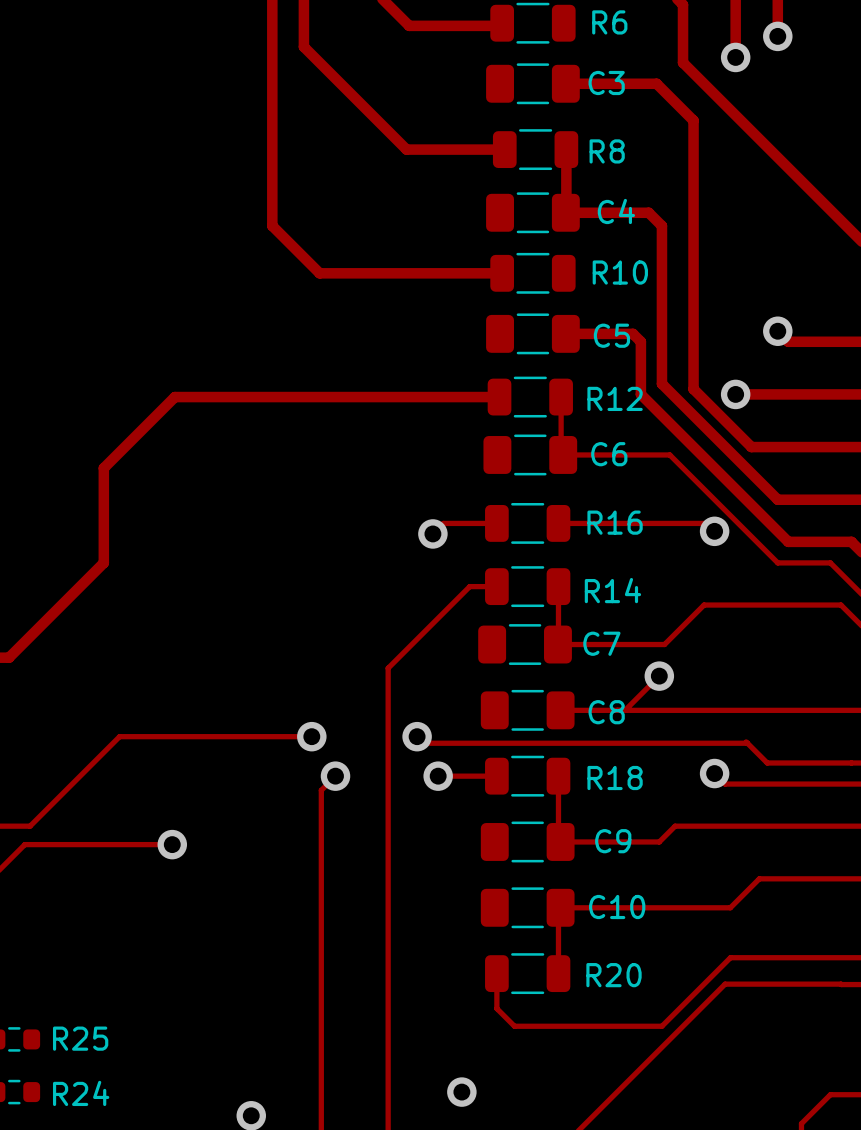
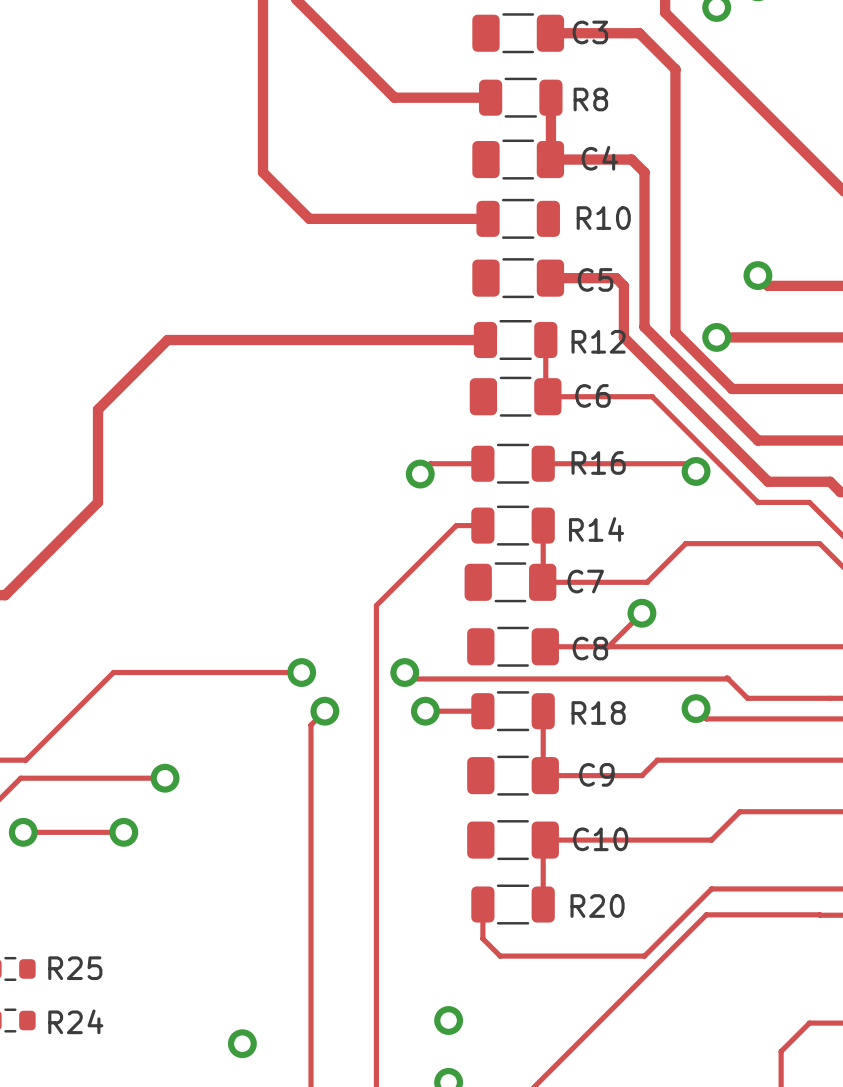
track: none -> (23, 832) (123, 832)
via: none -> (23, 832)
via: none -> (123, 832)

